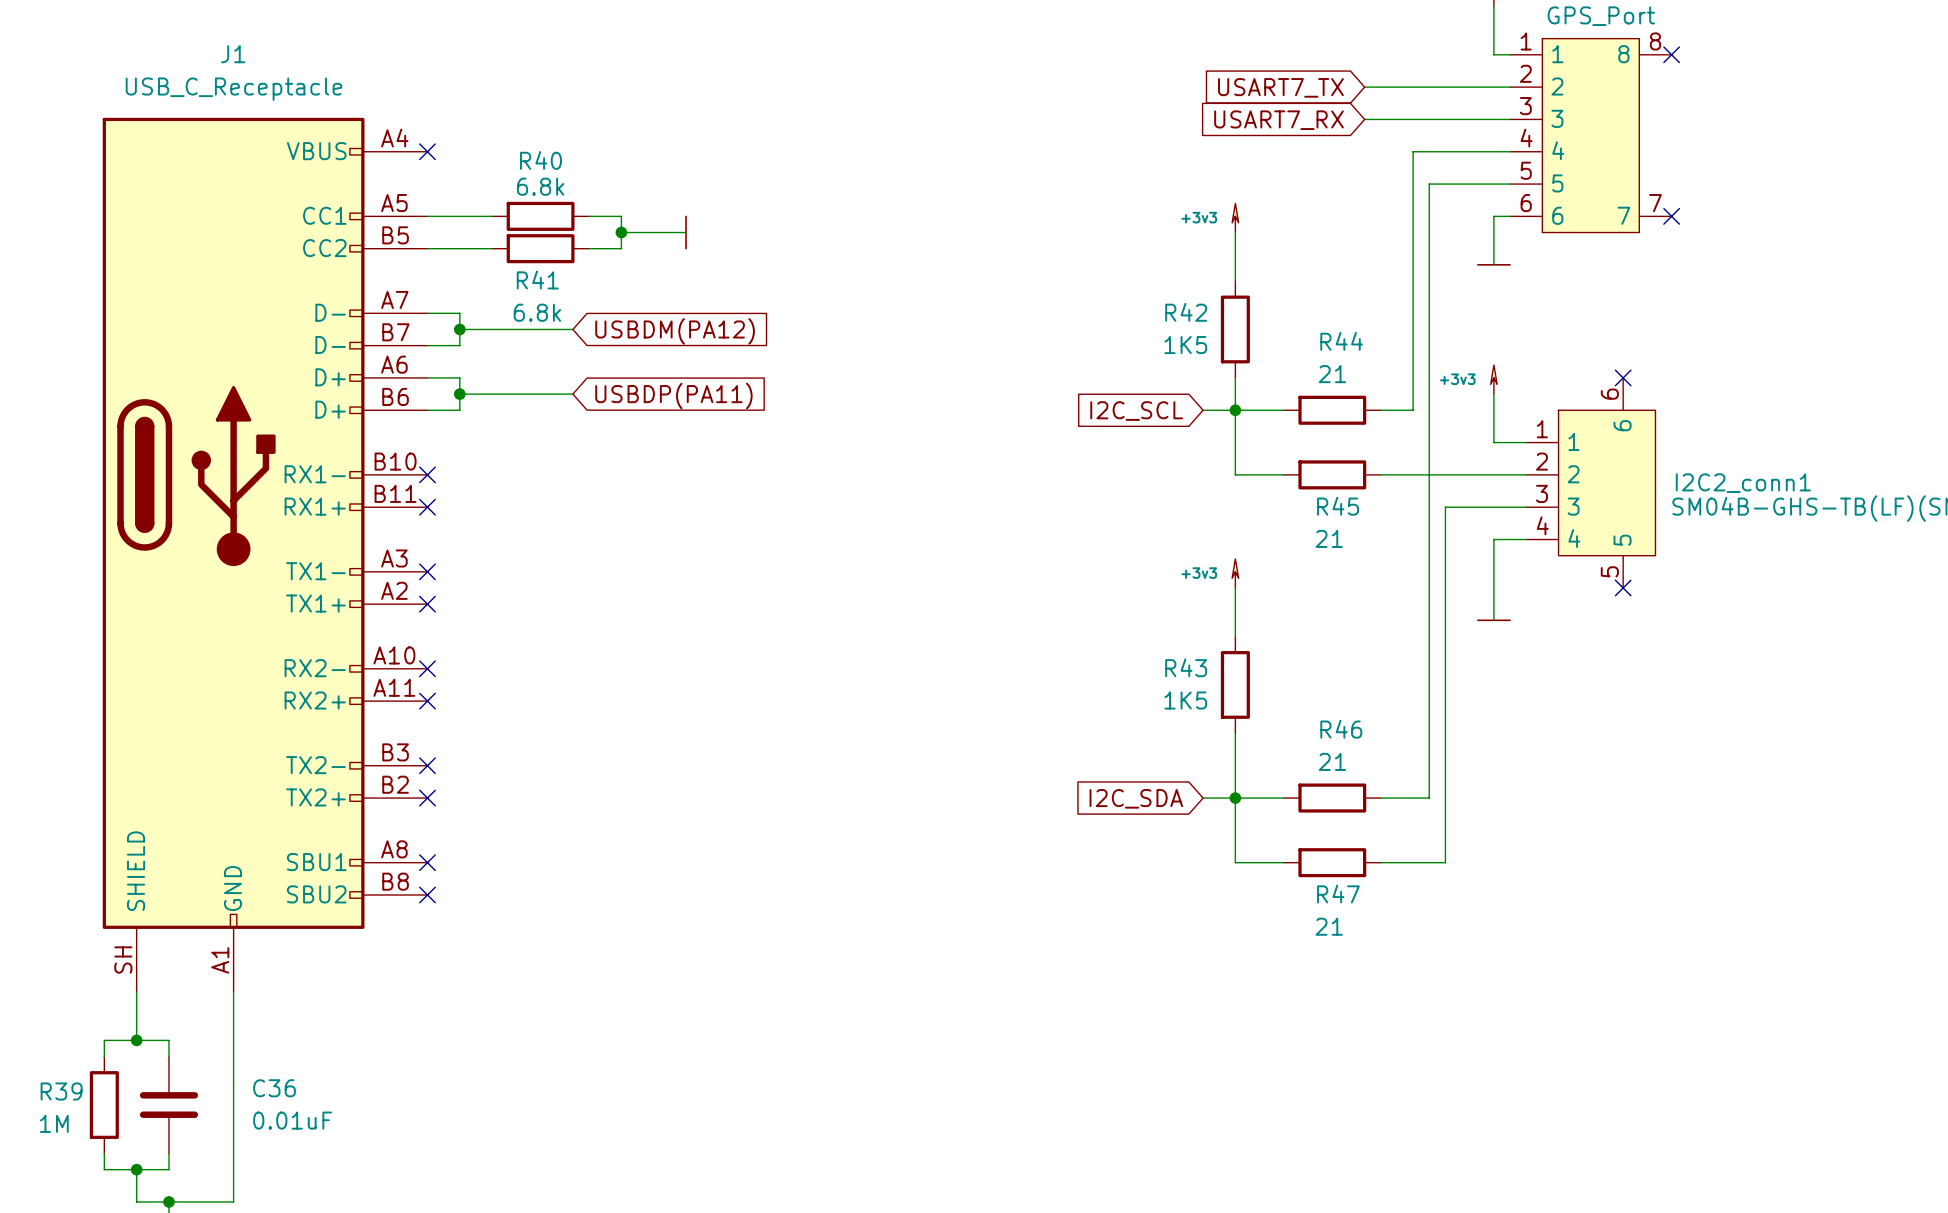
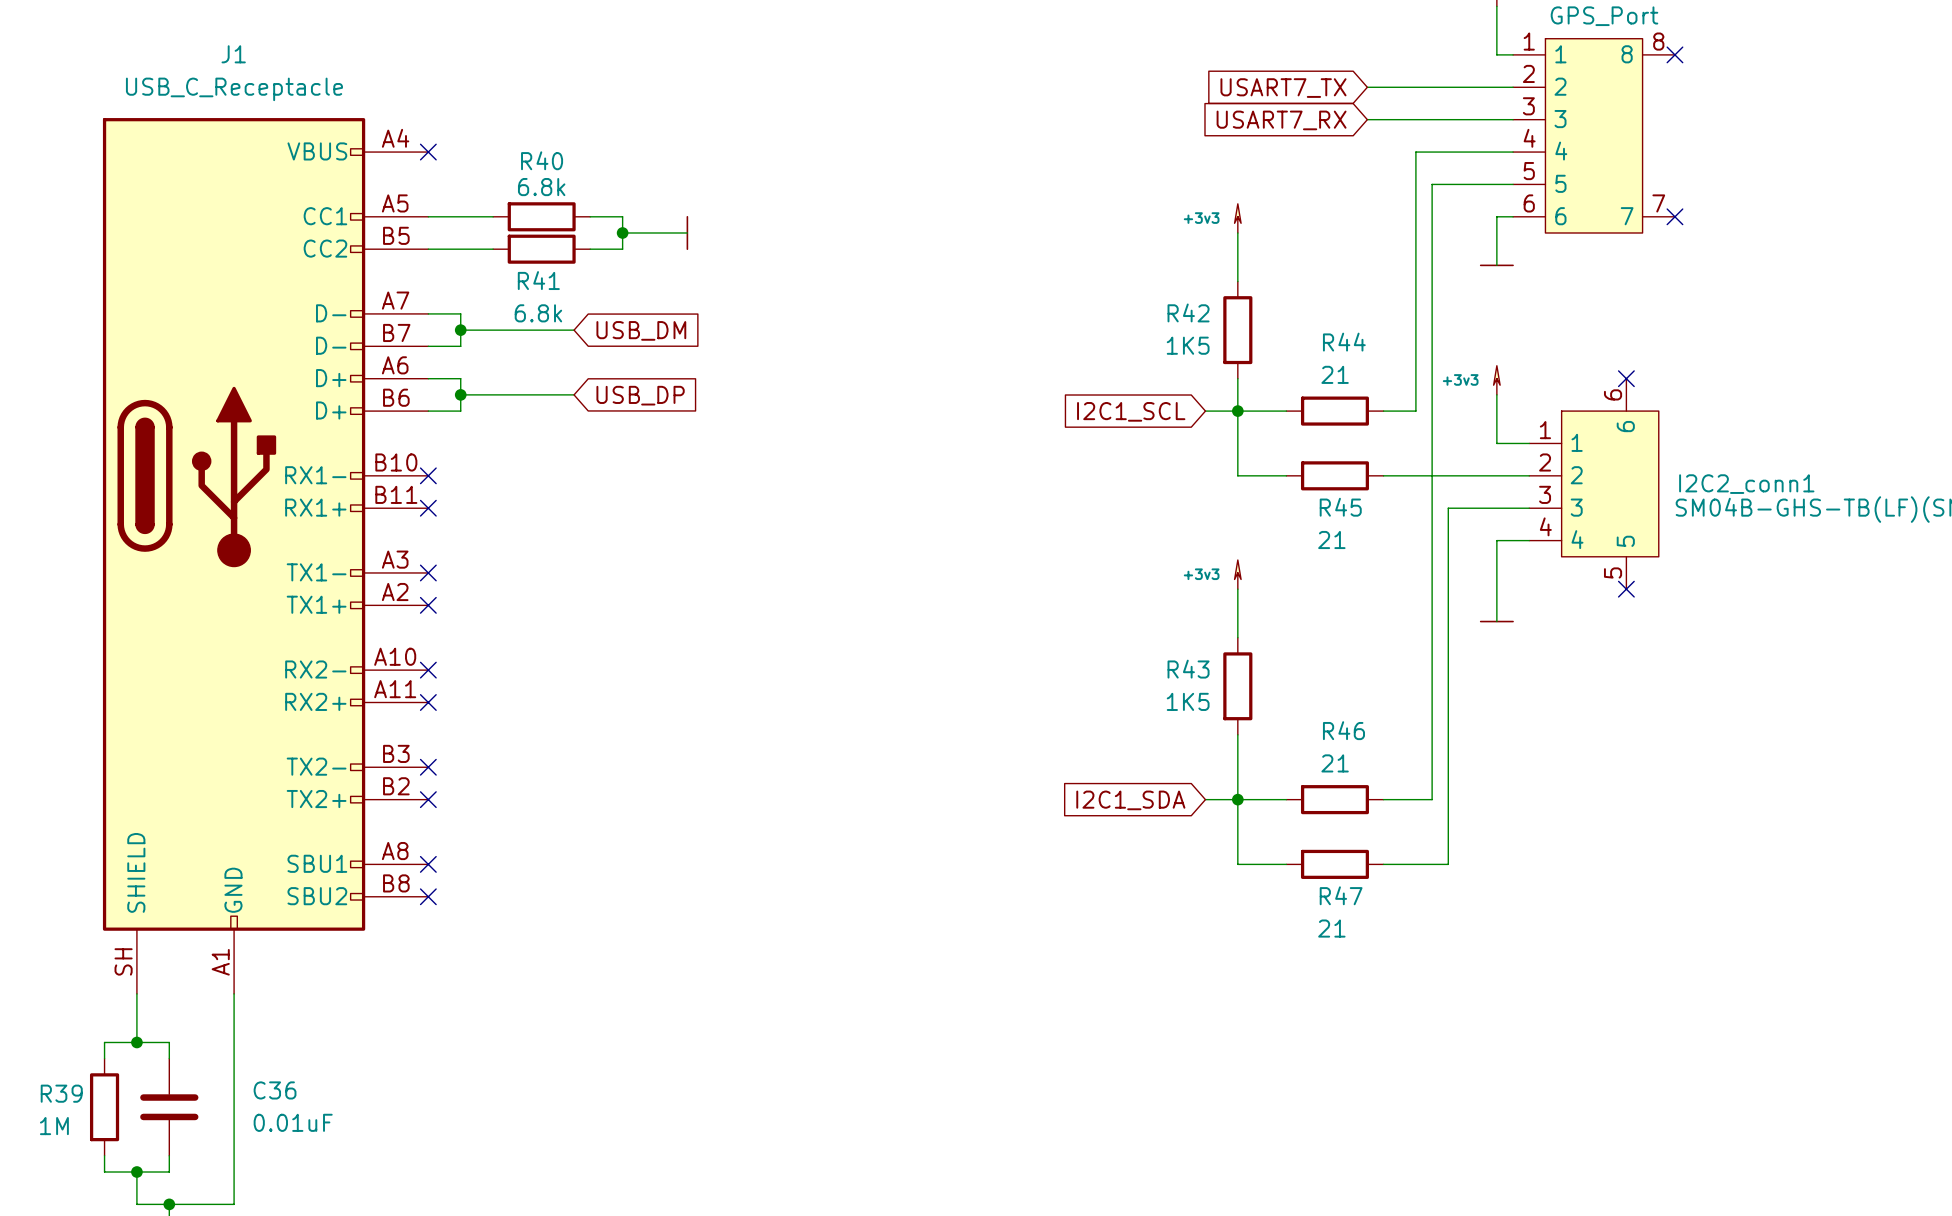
global label: USBDM(PA12) (675, 331) -> USB_DM (641, 330)
global label: USBDP(PA11) (673, 396) -> USB_DP (640, 395)
global label: I2C_SCL (1136, 411) -> I2C1_SCL (1131, 411)
global label: I2C_SDA (1136, 798) -> I2C1_SDA (1130, 800)

